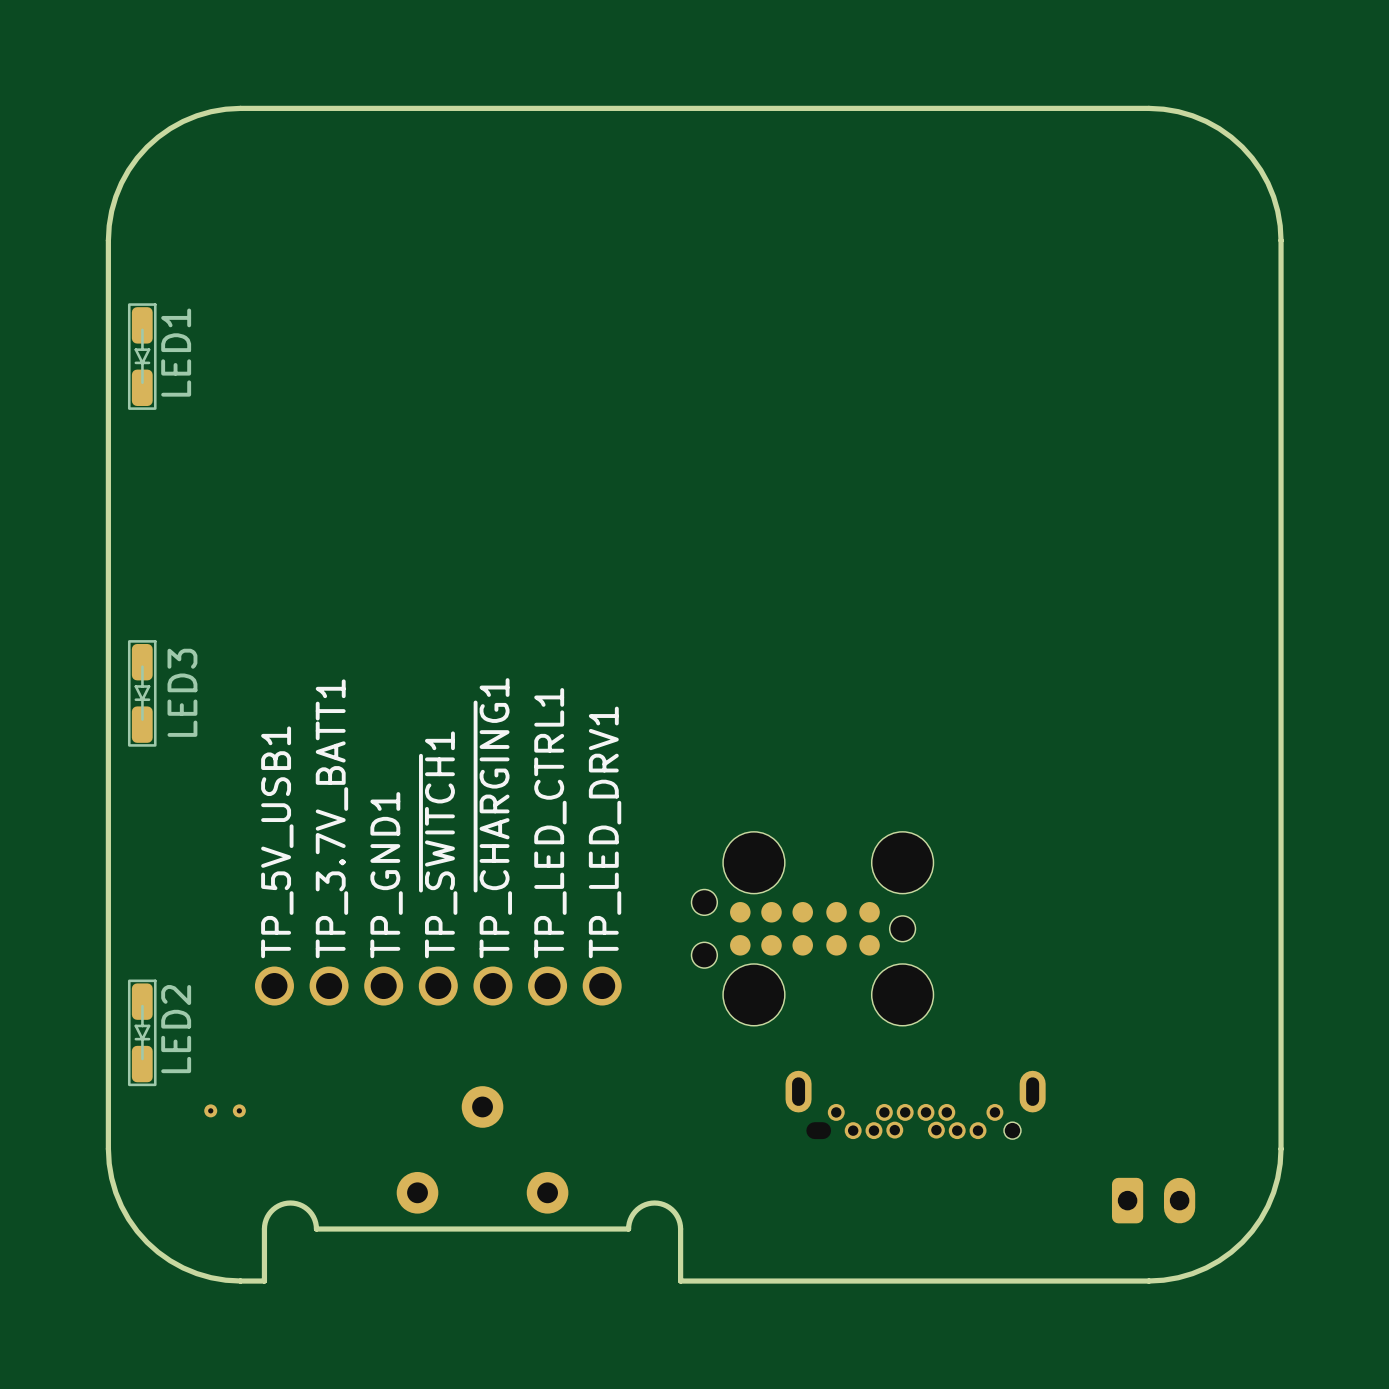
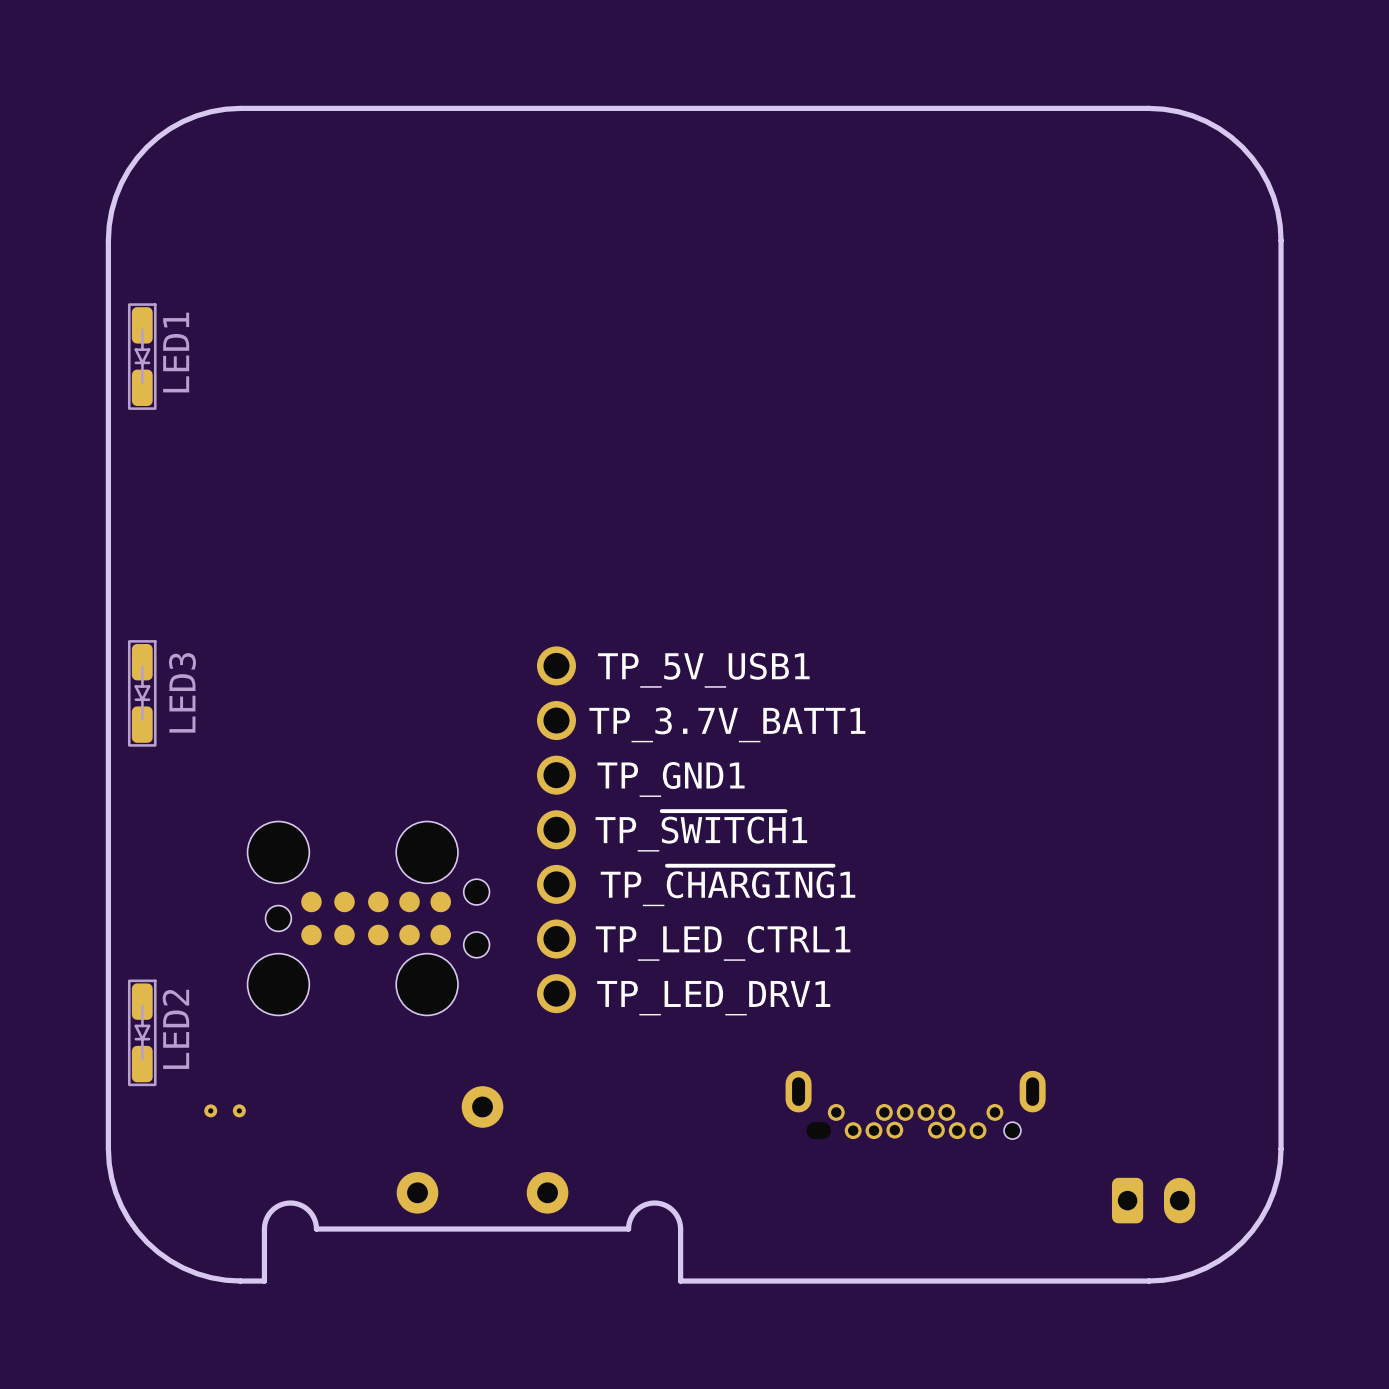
TP_3.7V_BATT1 name rotation: 0° (331, 818) -> 90° clockwise (727, 724)
TP_~{CHARGING}1 name rotation: 0° (492, 818) -> 90° clockwise (728, 885)
TP_LED_CTRL1 name rotation: 0° (550, 823) -> 90° clockwise (723, 943)
TP_LED_DRV1 name rotation: 0° (605, 832) -> 90° clockwise (713, 998)
TP_5V_USB1 name rotation: 0° (277, 842) -> 90° clockwise (703, 670)
TP_~{SWITCH}1 name rotation: 0° (438, 844) -> 90° clockwise (701, 831)
TP_GND1 name rotation: 0° (386, 875) -> 90° clockwise (671, 779)
part rotation: 0° (812, 928) -> 180° (368, 918)
part position: (812, 928) -> (368, 918)
TP_5V_USB1 position: (274, 986) -> (556, 665)
TP_3.7V_BATT1 position: (329, 986) -> (556, 720)
TP_GND1 position: (383, 986) -> (556, 775)
TP_~{SWITCH}1 position: (438, 986) -> (556, 829)
TP_~{CHARGING}1 position: (492, 986) -> (556, 884)
TP_LED_CTRL1 position: (547, 986) -> (556, 939)
TP_LED_DRV1 position: (602, 986) -> (556, 993)

